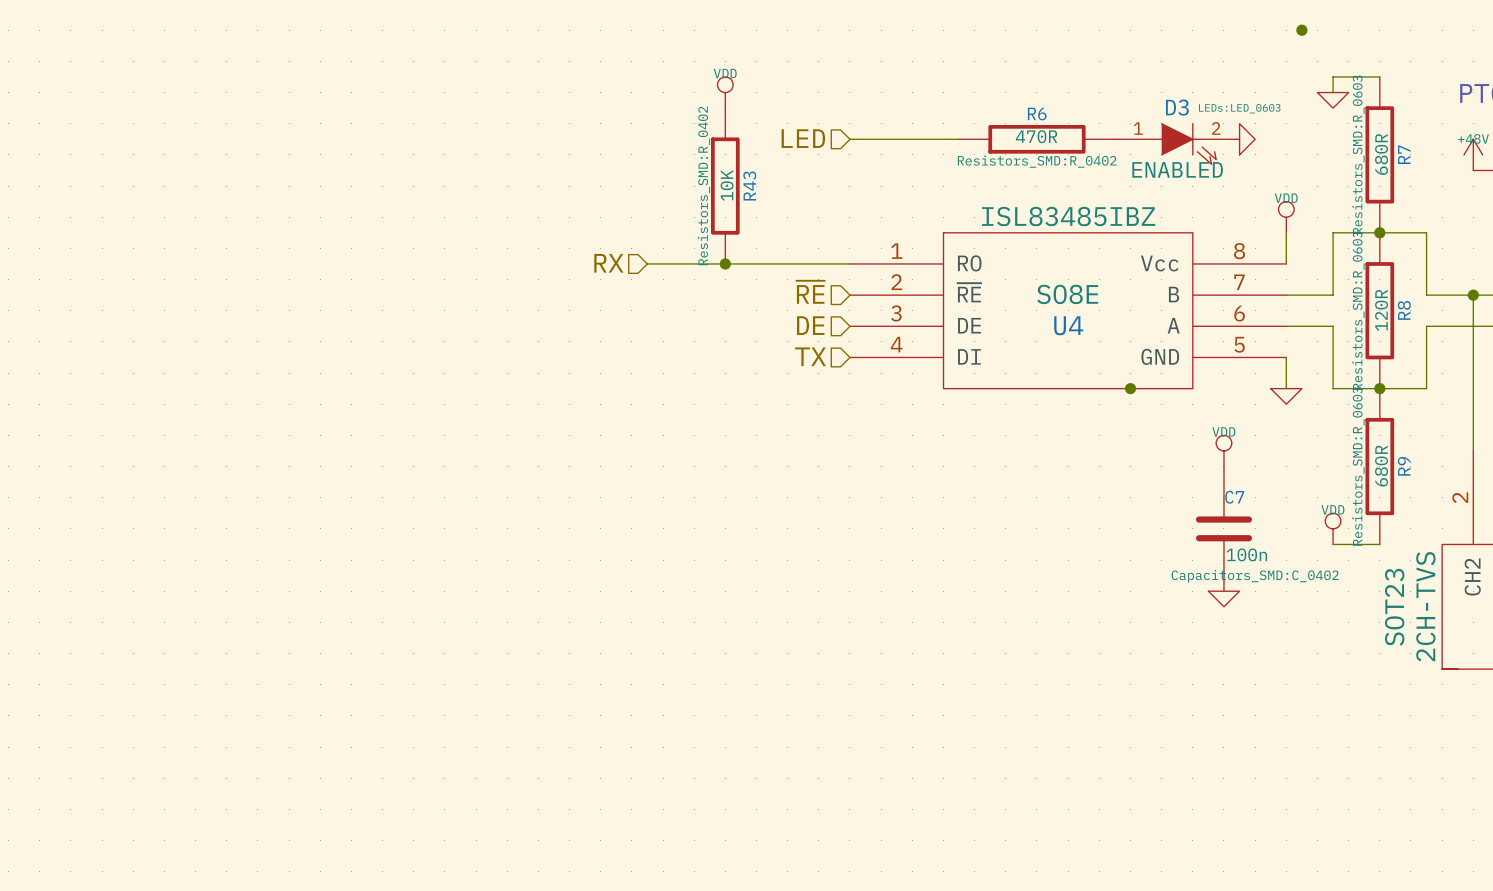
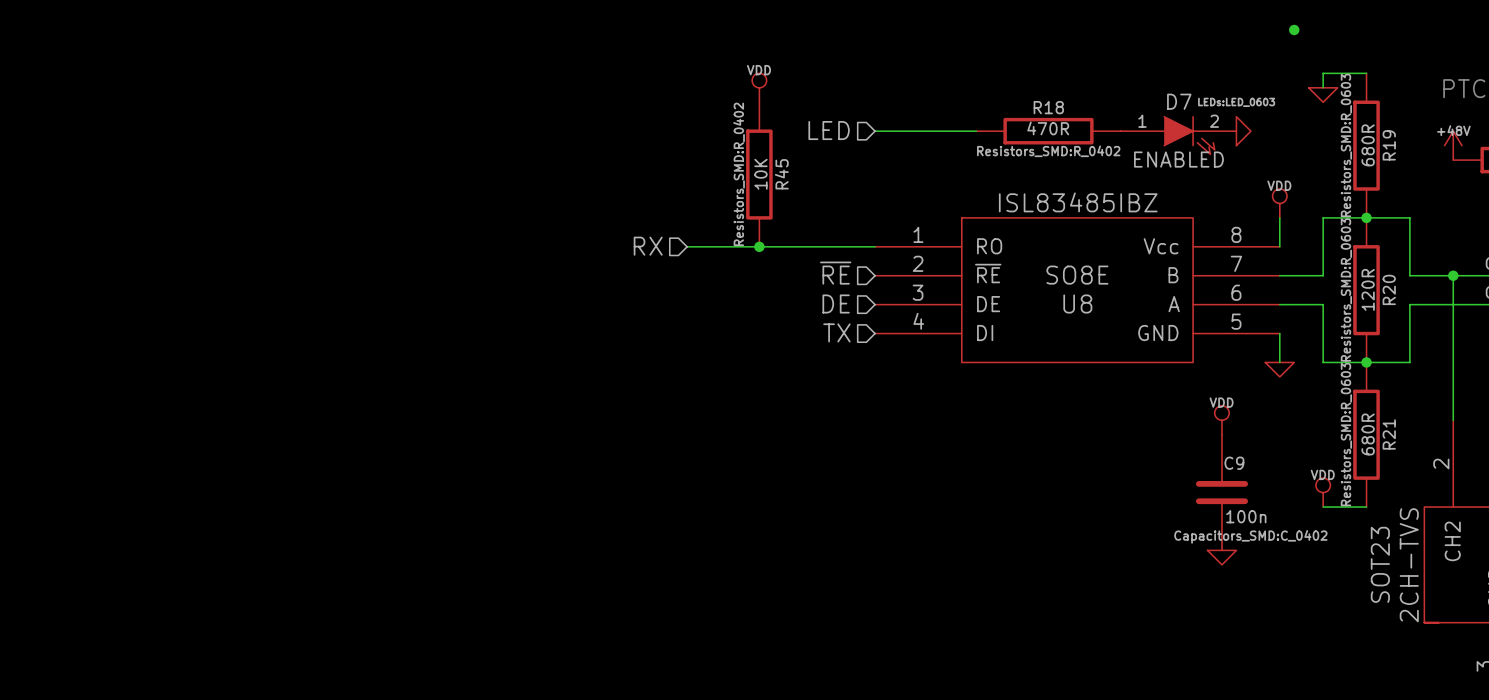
D3 name: D3 (1177, 107) -> D7 (1179, 101)
R6 name: R6 (1037, 114) -> R18 (1048, 107)
R7 name: R7 (1404, 154) -> R19 (1389, 145)
R43 name: R43 (749, 185) -> R45 (781, 174)
R8 name: R8 (1404, 310) -> R20 (1389, 289)
U4 name: U4 (1068, 325) -> U8 (1077, 303)
junction: (1130, 388) -> none
R9 name: R9 (1404, 466) -> R21 (1389, 434)
C7 name: C7 (1234, 497) -> C9 (1234, 463)

